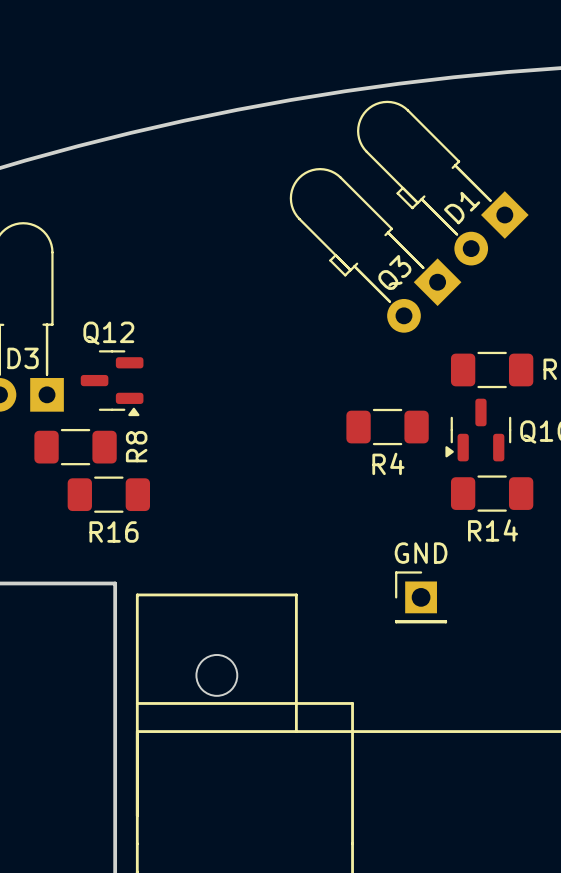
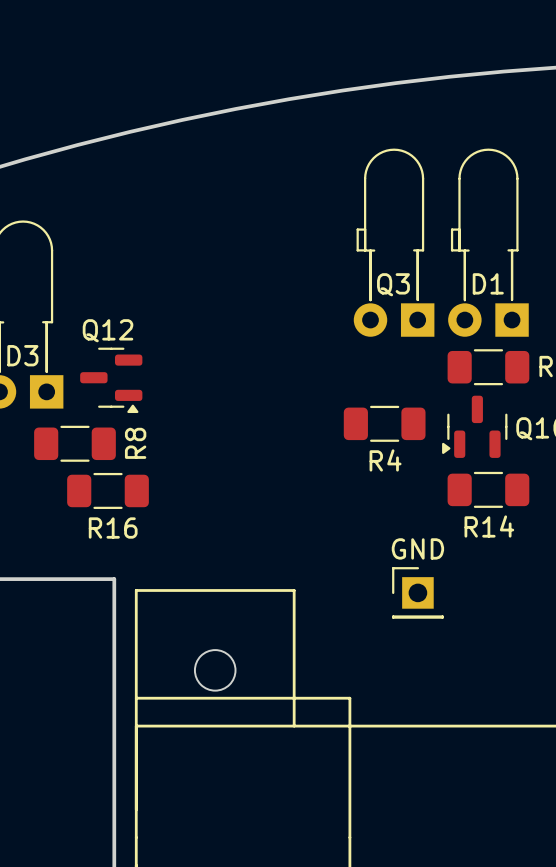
D1 rotation: 0° (442, 183) -> 45° clockwise (488, 242)
Q3 rotation: 0° (375, 250) -> 45° clockwise (394, 242)

